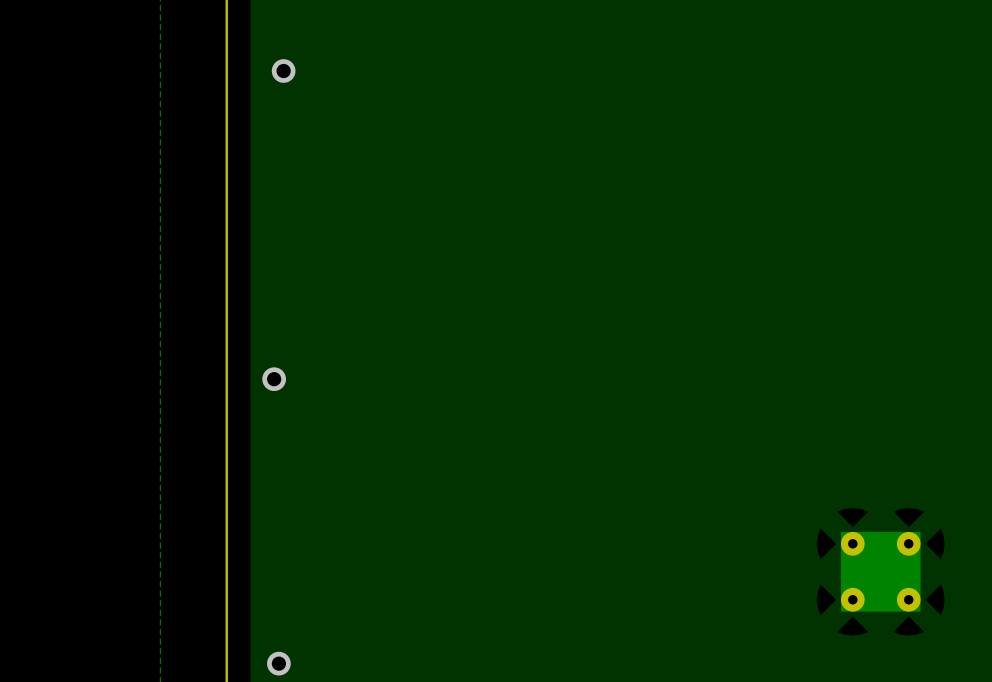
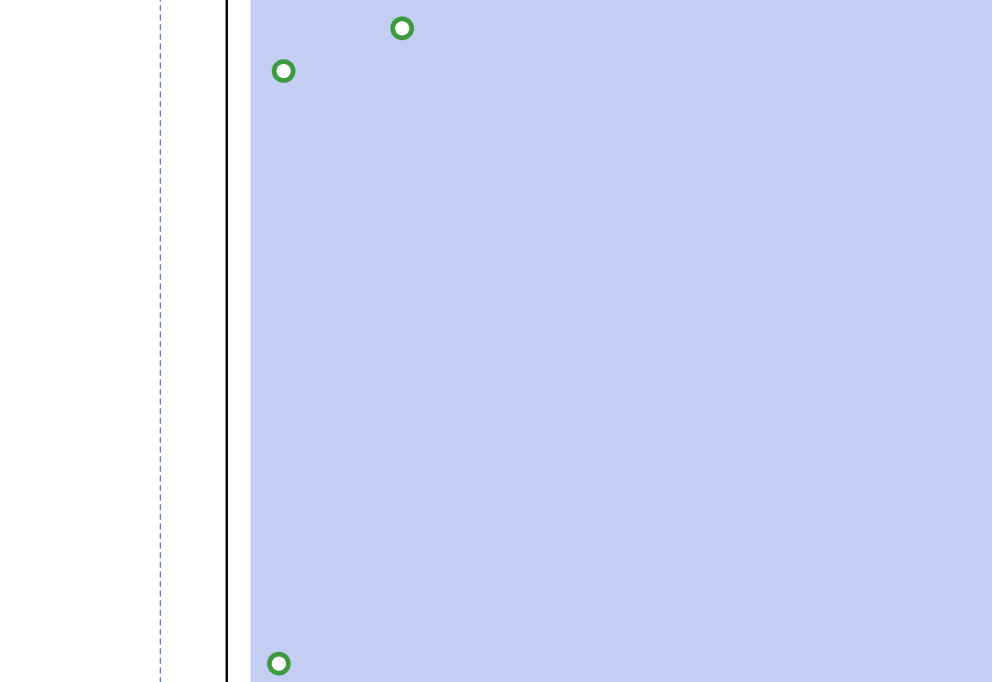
via: none -> (402, 28)
via: (274, 379) -> none
part: (880, 571) -> none

